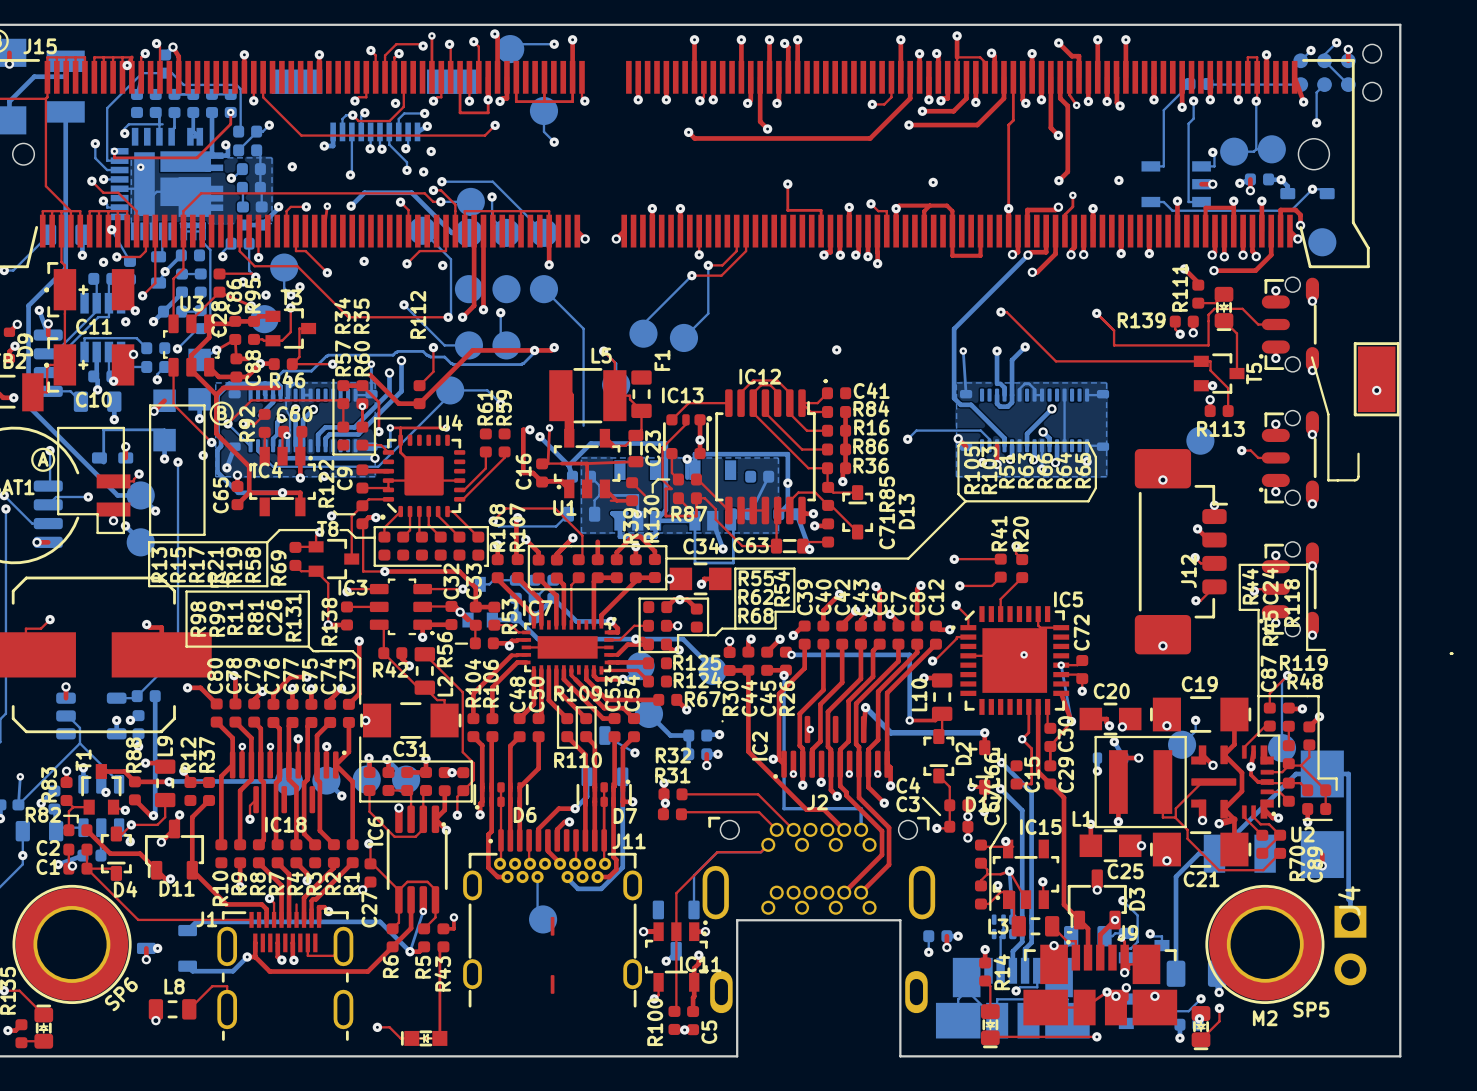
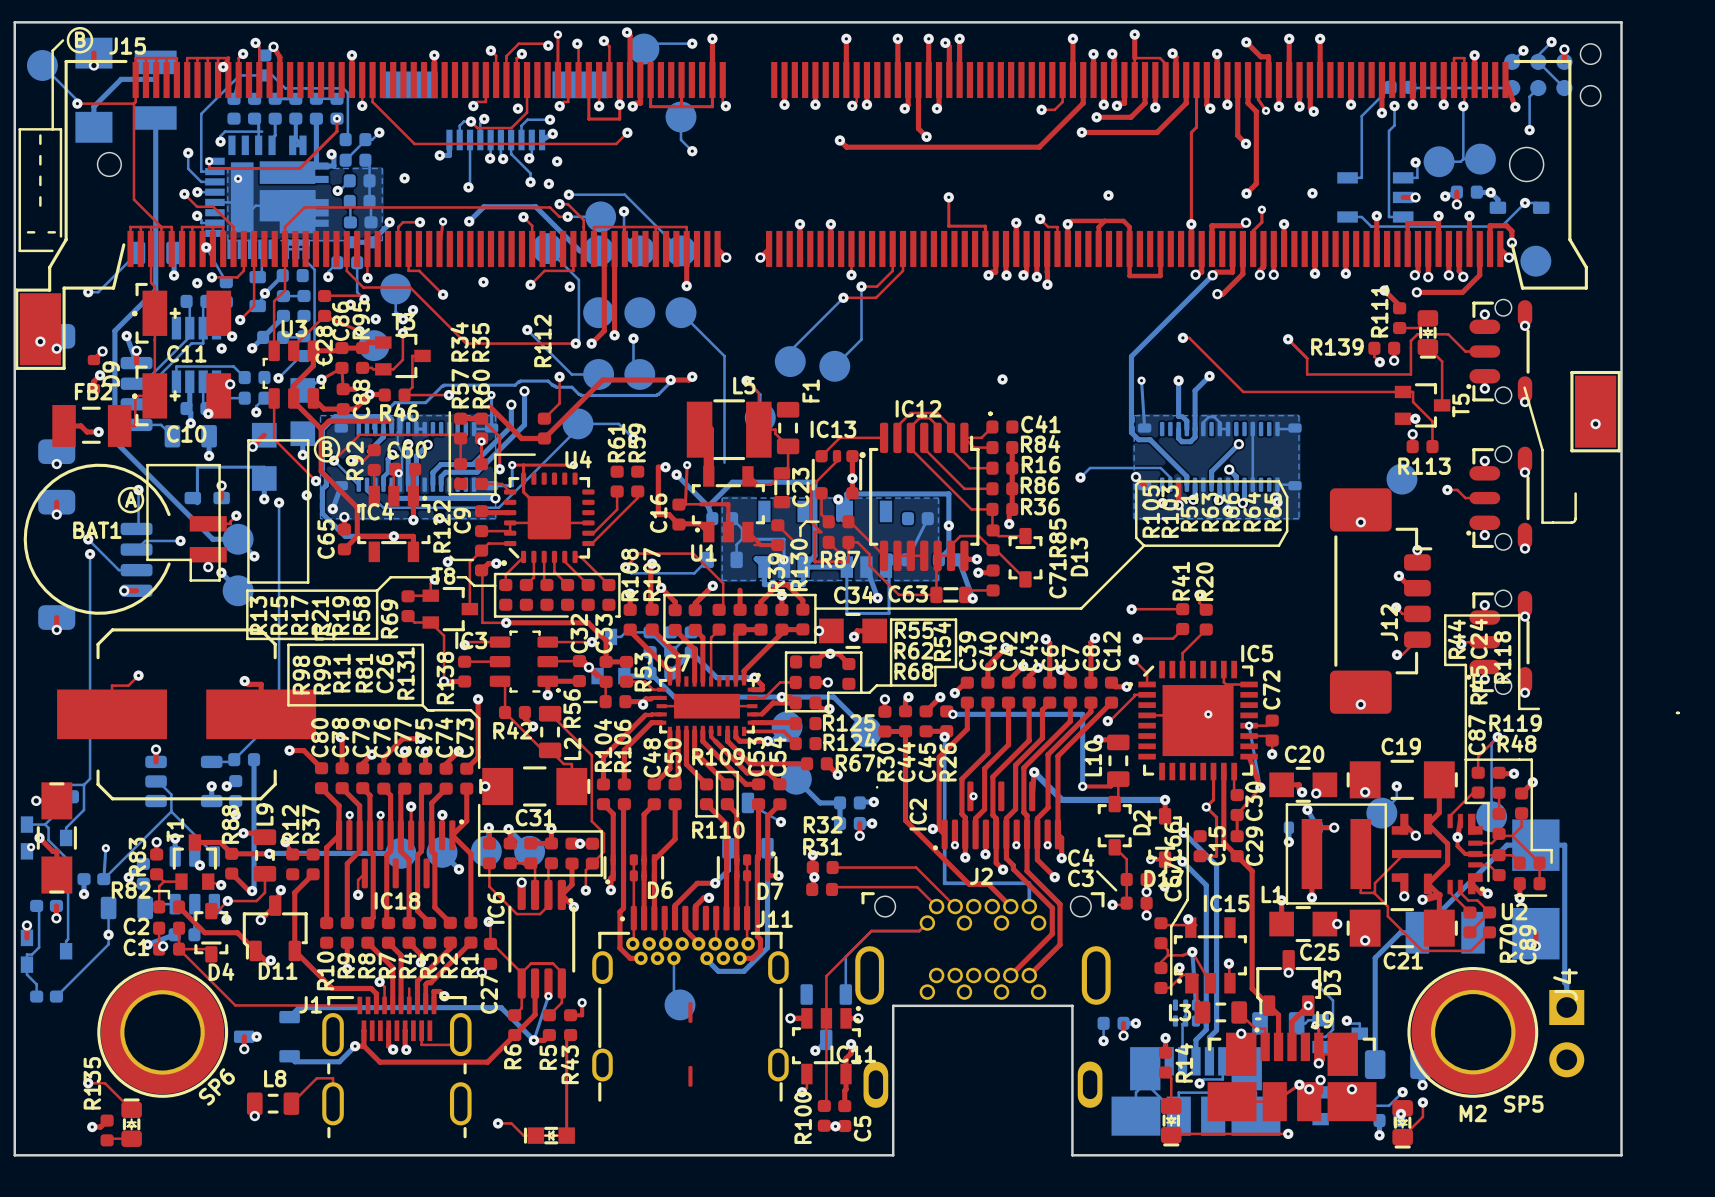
top track: (635, 461) (587, 463) -> none

